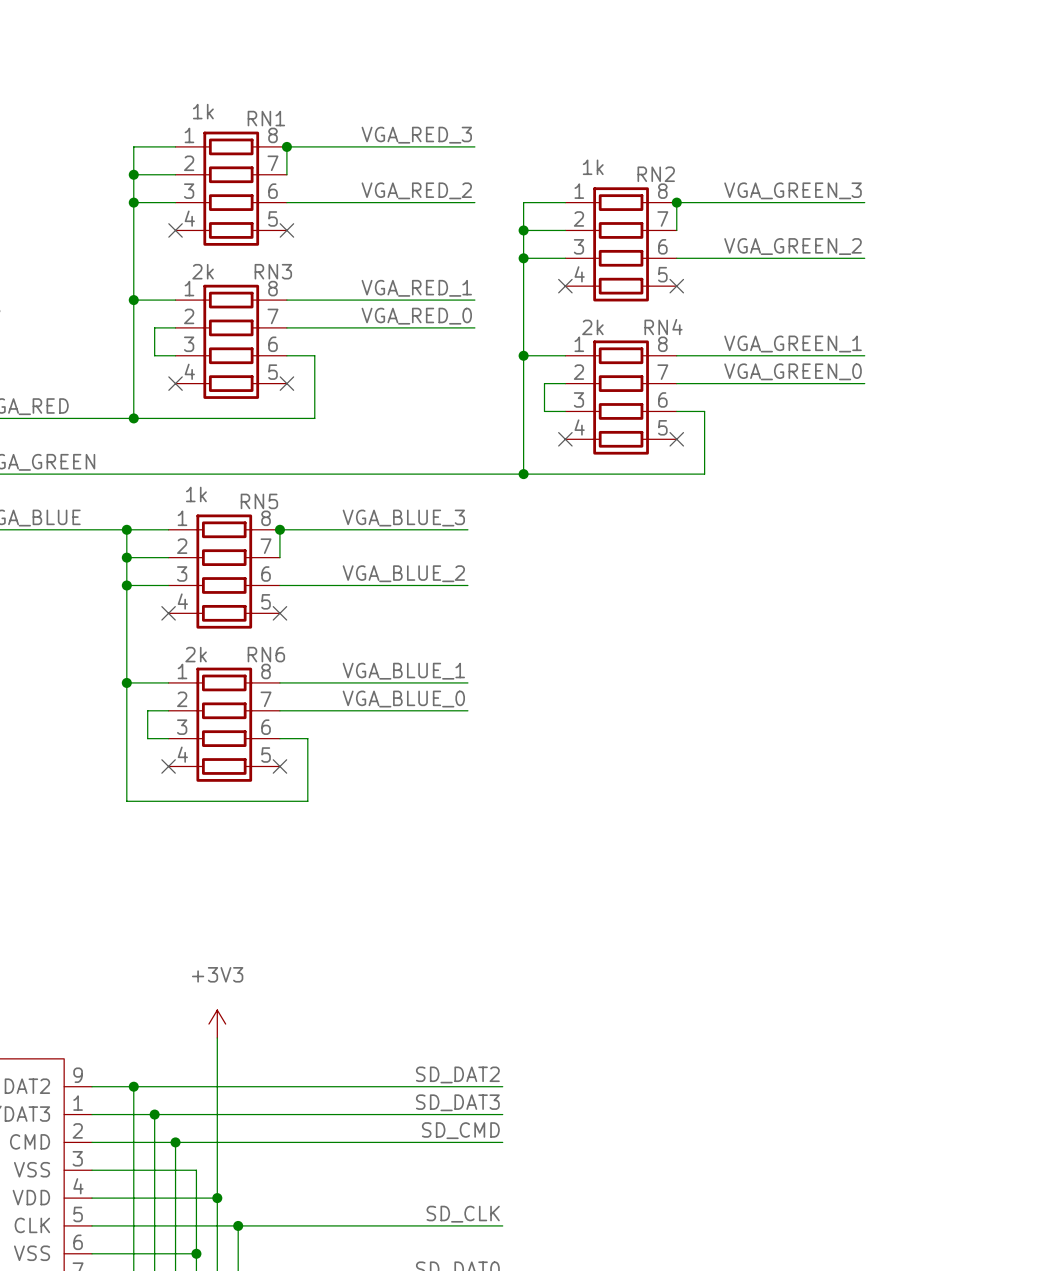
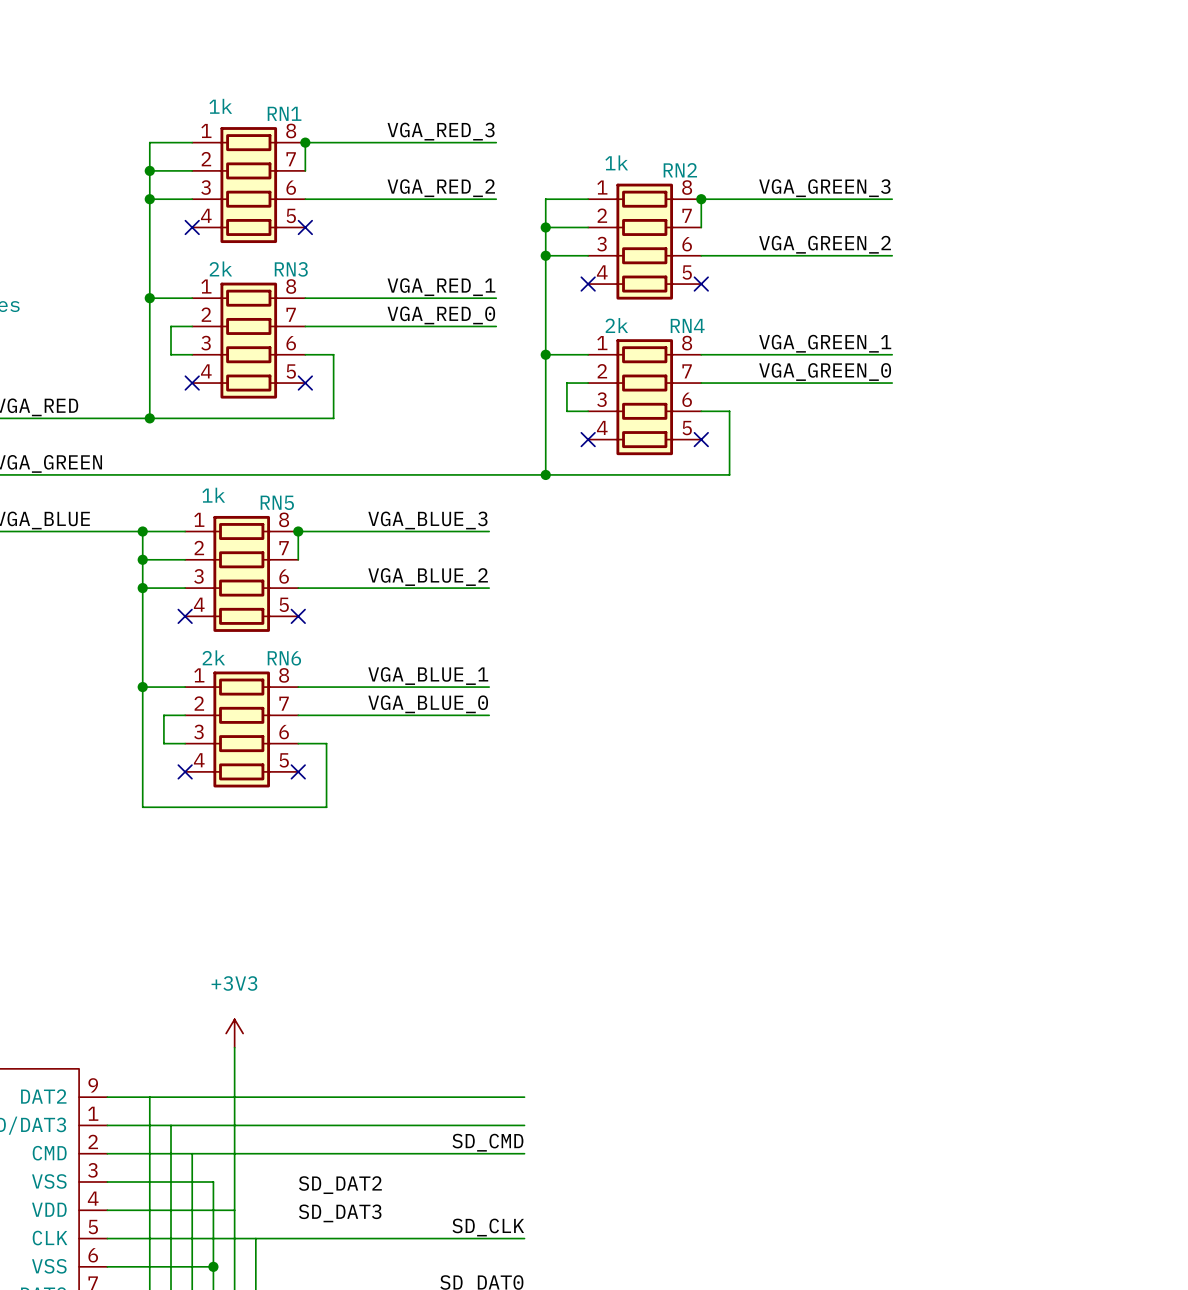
label position: SD_DAT2 (457, 1074) -> SD_DAT2 (340, 1185)
junction: (133, 1086) -> none
label position: SD_DAT3 (457, 1102) -> SD_DAT3 (340, 1213)
junction: (154, 1114) -> none
junction: (175, 1142) -> none
junction: (217, 1198) -> none
junction: (238, 1225) -> none

